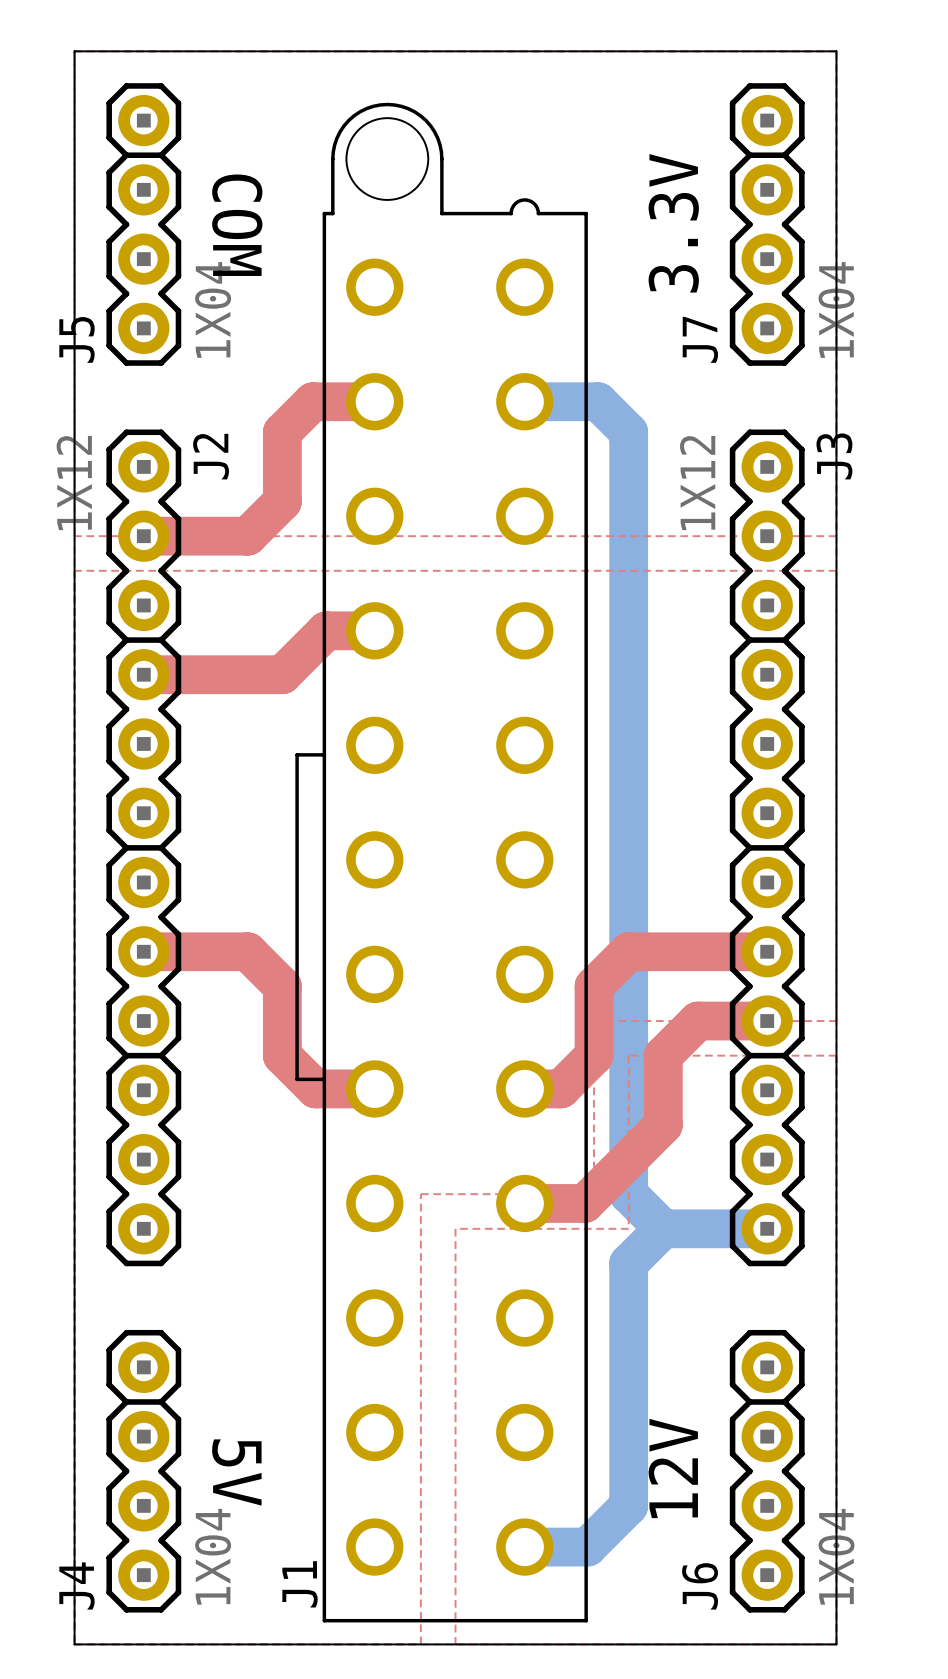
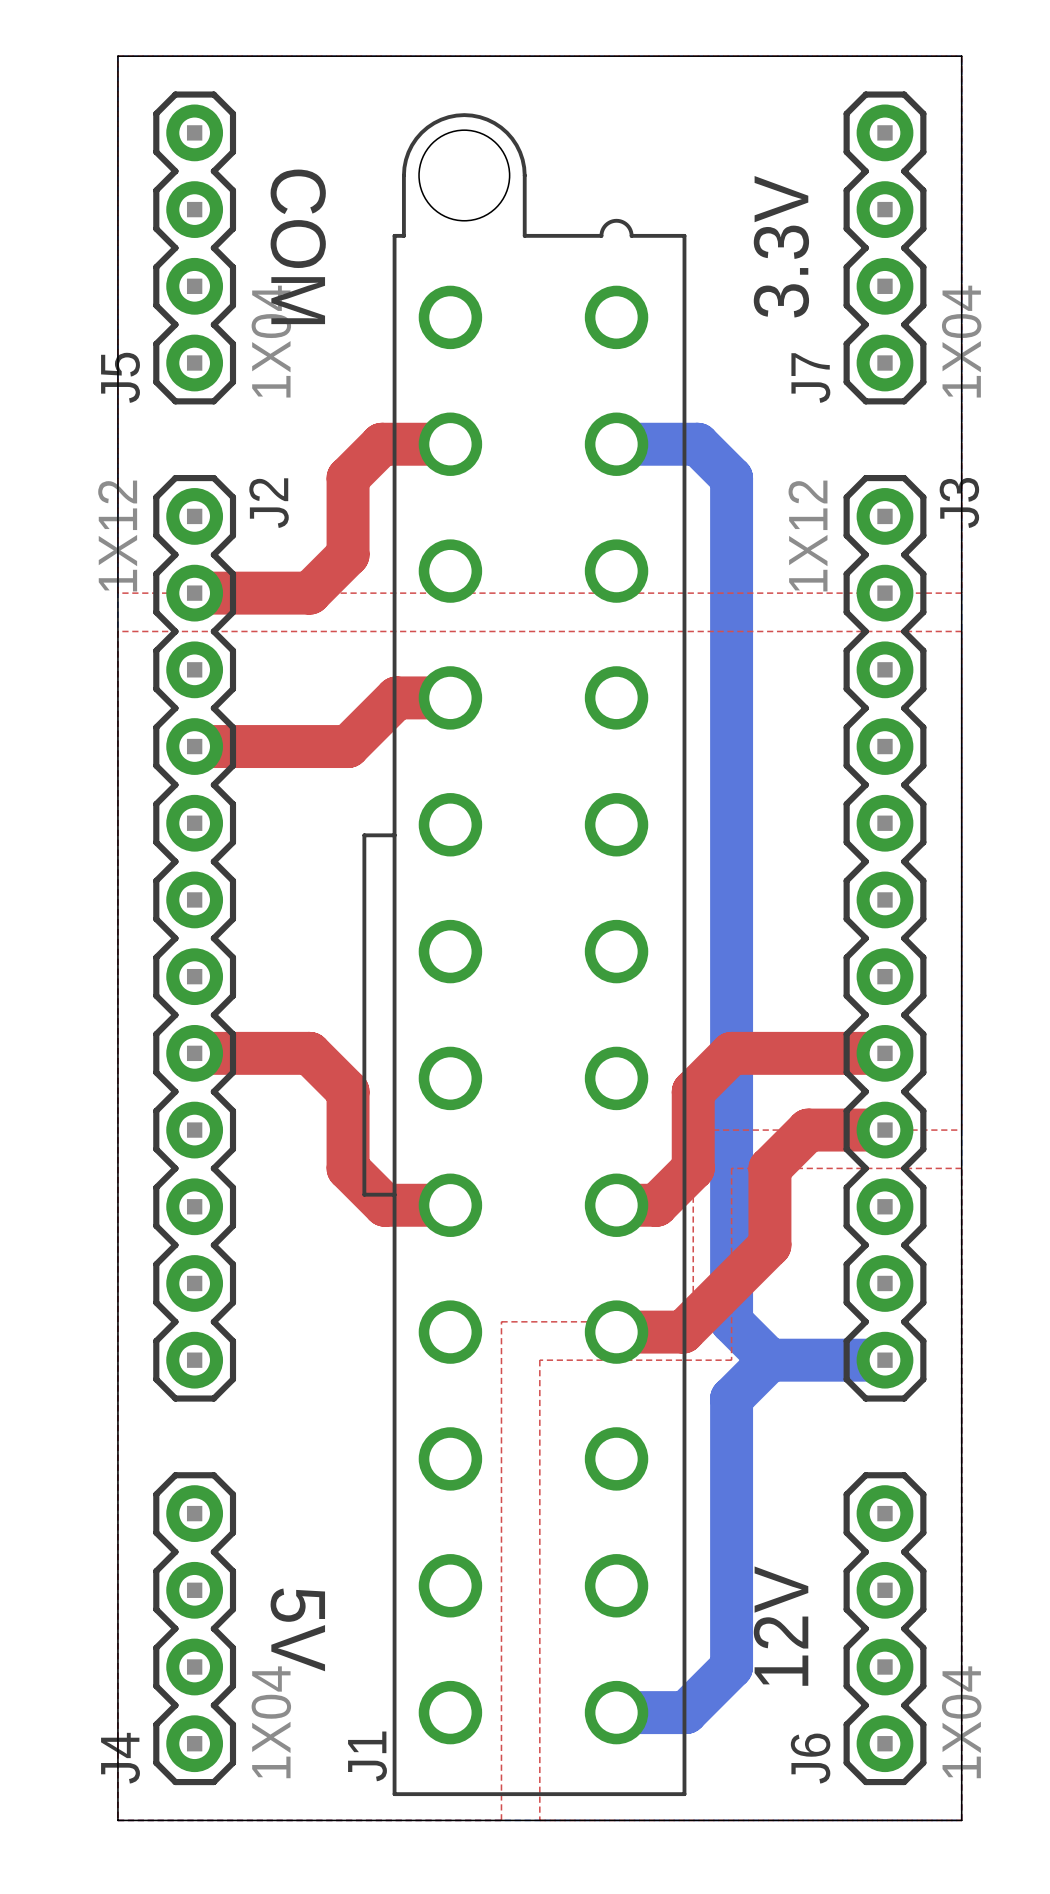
J5 footprint: [106, 83, 182, 366] -> [153, 91, 237, 405]
J7 footprint: [729, 83, 805, 366] -> [843, 91, 927, 405]
J2 footprint: [106, 429, 182, 1267] -> [153, 475, 237, 1402]
J3 footprint: [729, 429, 805, 1267] -> [843, 475, 927, 1402]
J4 footprint: [106, 1329, 182, 1613] -> [153, 1472, 237, 1786]
J6 footprint: [729, 1329, 805, 1613] -> [843, 1472, 927, 1786]

